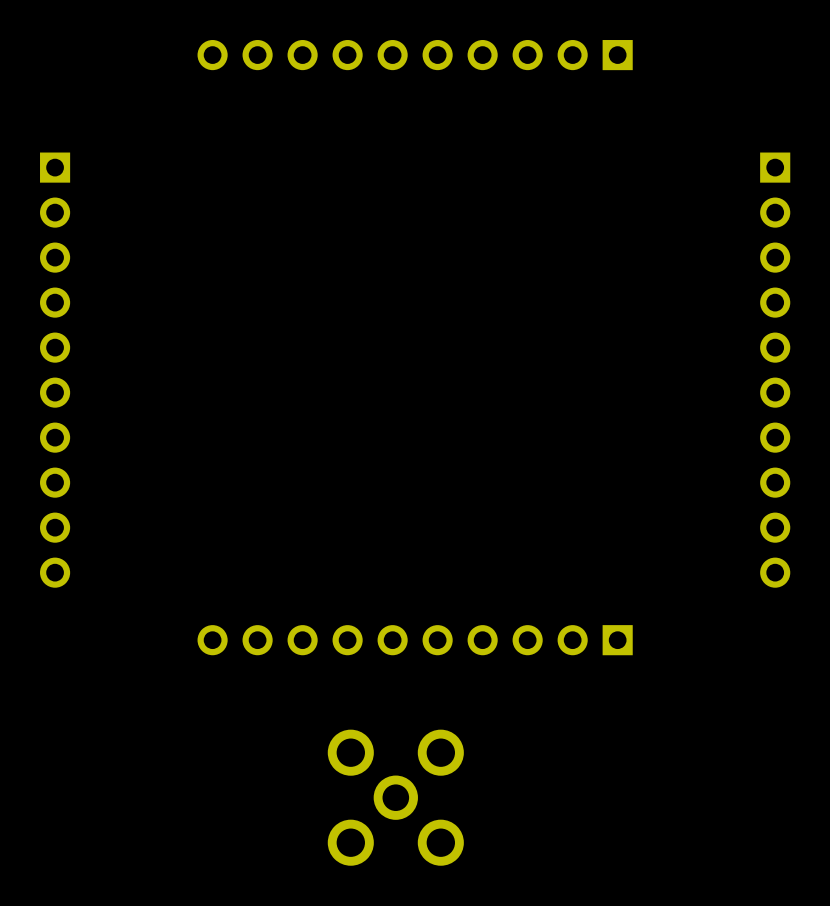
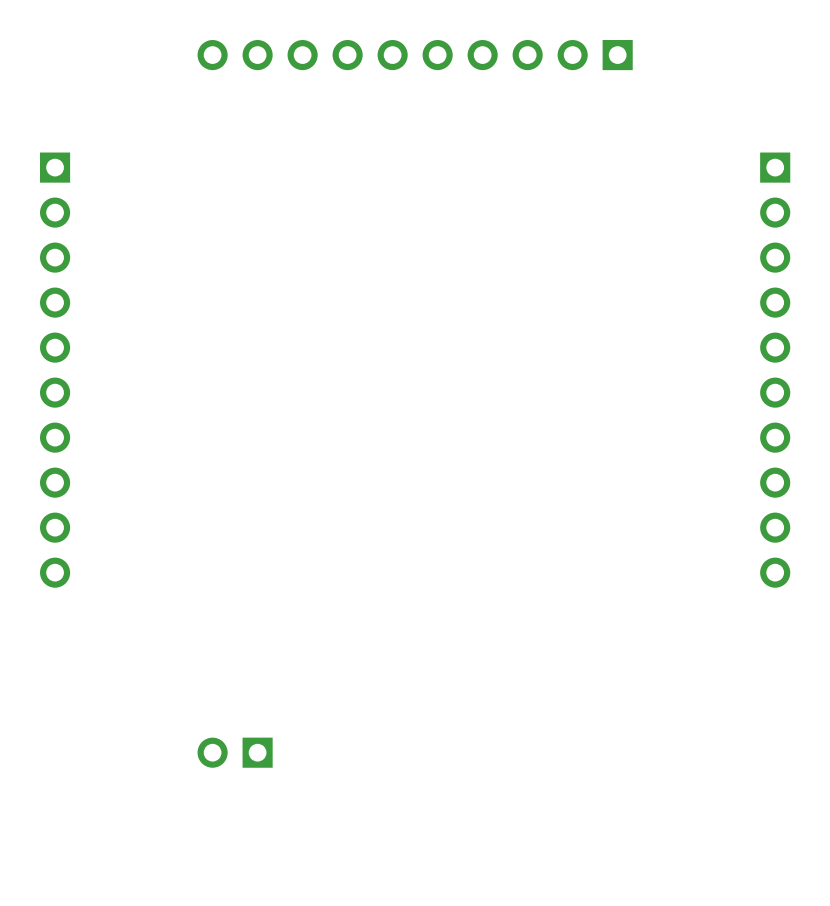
part: (415, 640) -> none
part: none -> (235, 752)
part: (395, 797) -> none

